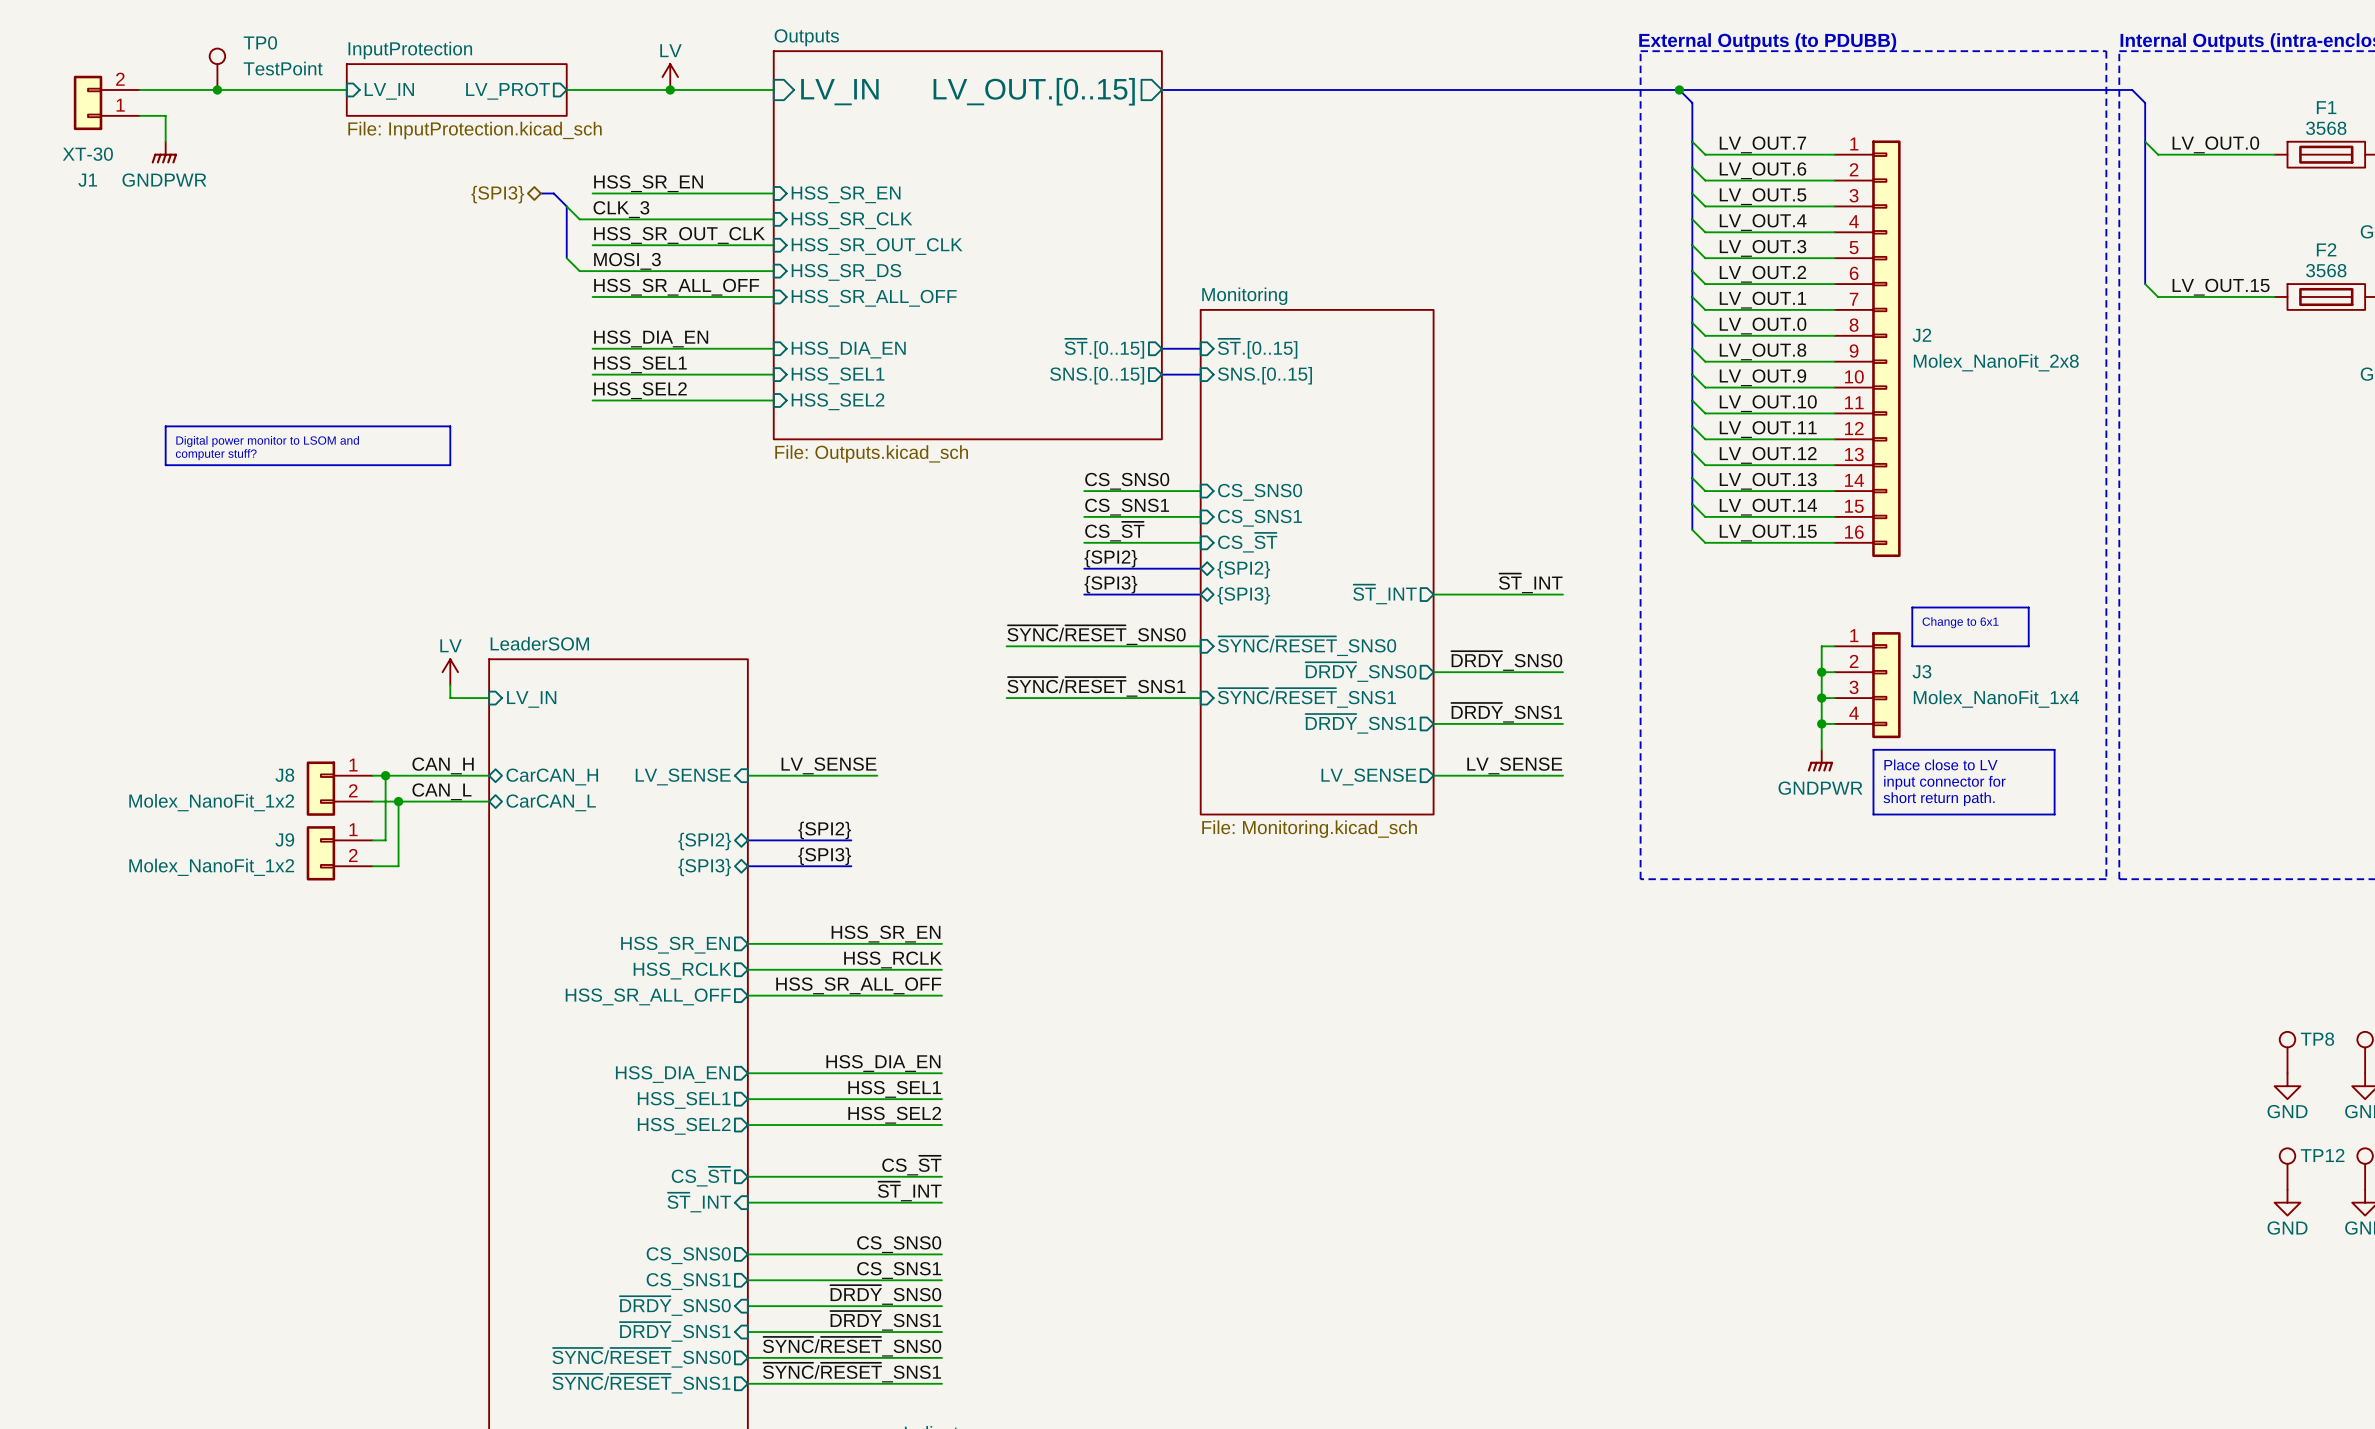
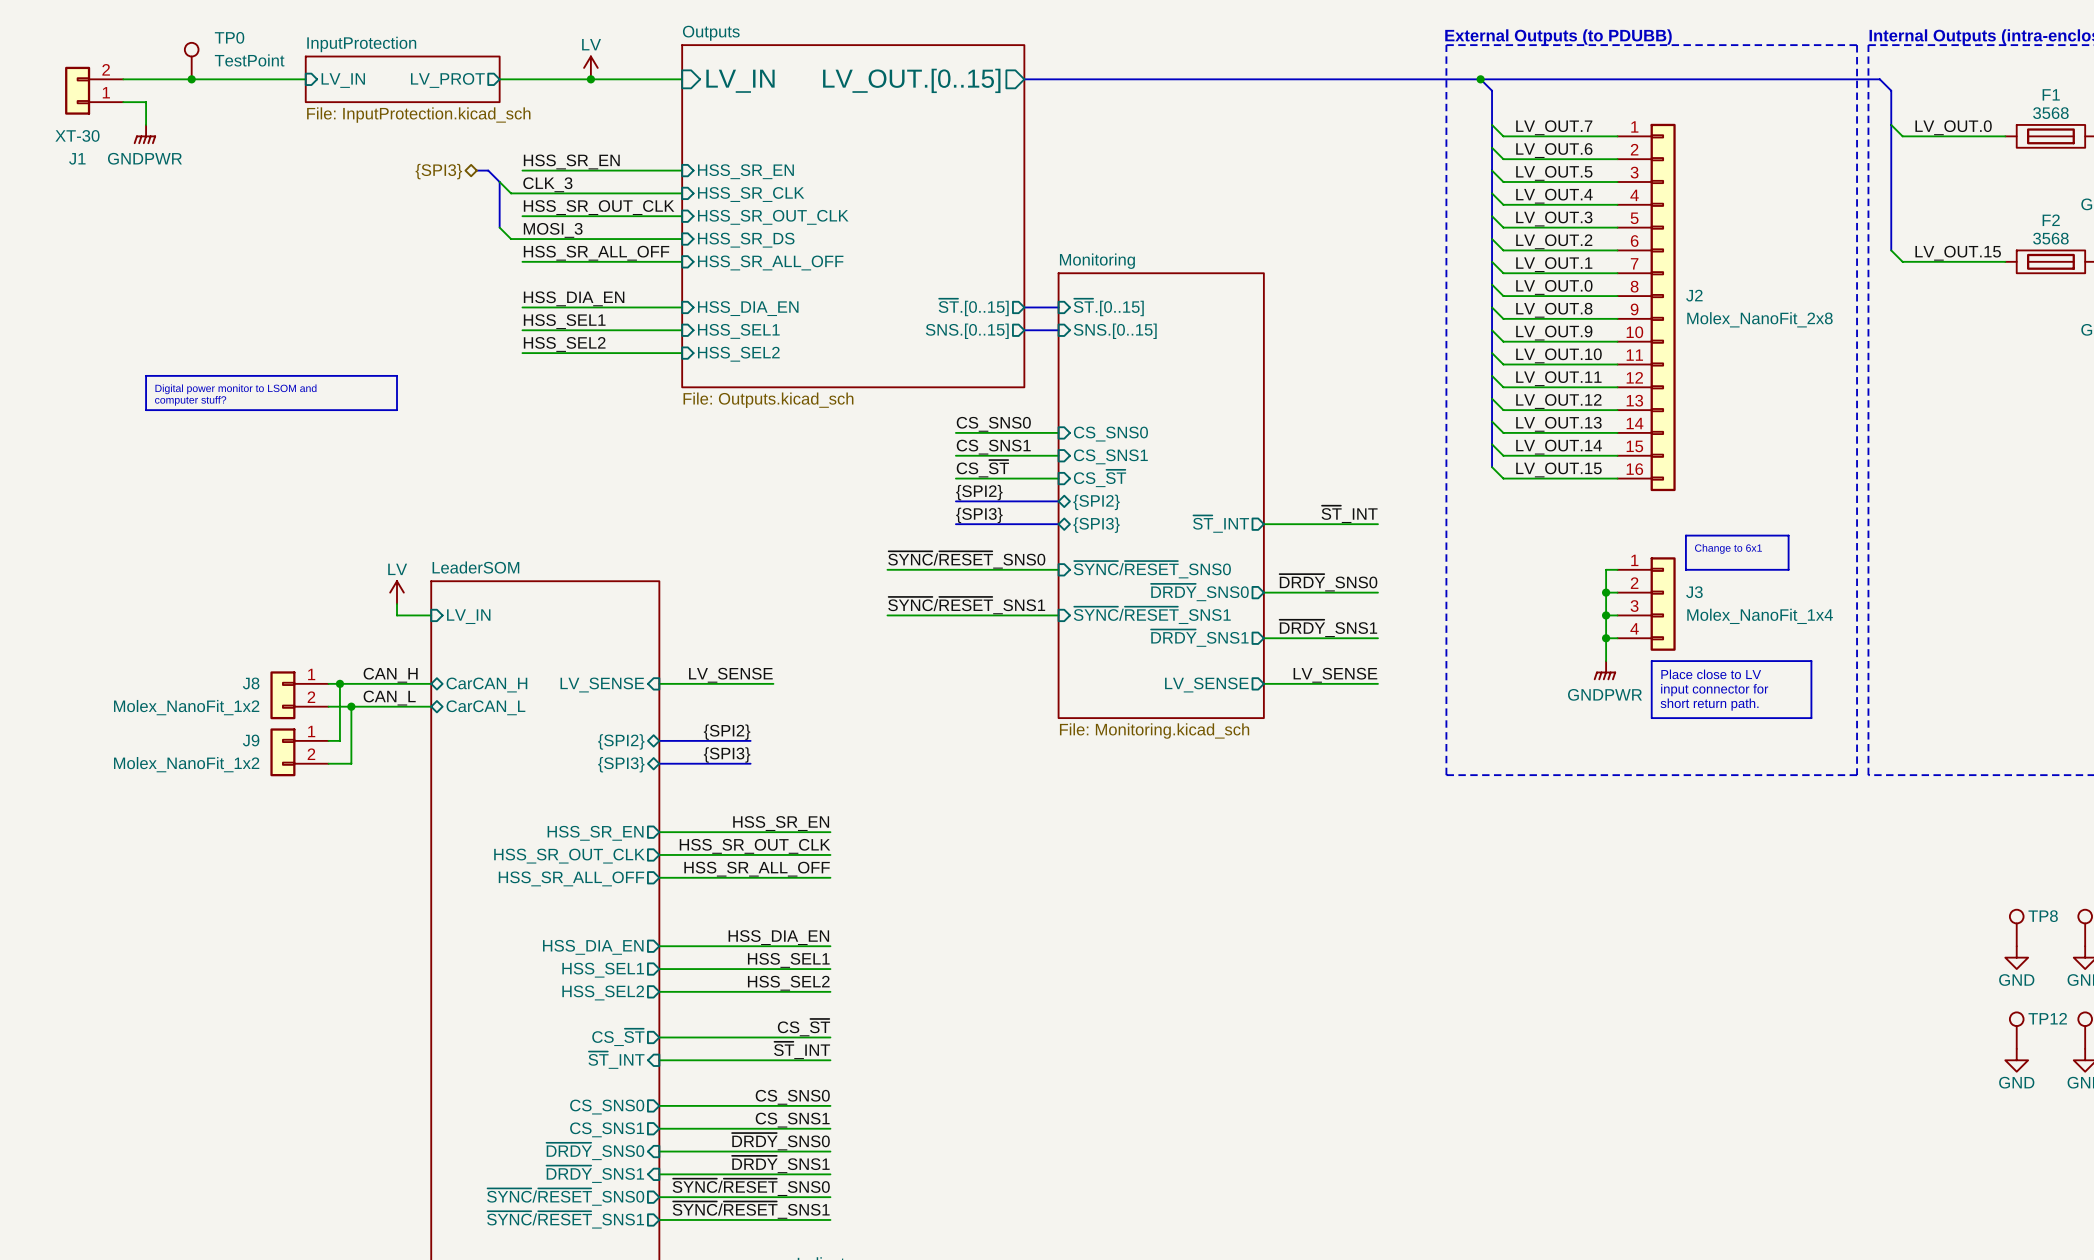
label: HSS_RCLK (892, 959) -> HSS_SR_OUT_CLK (755, 846)
sheet pin: HSS_RCLK (682, 971) -> HSS_SR_OUT_CLK (569, 856)

